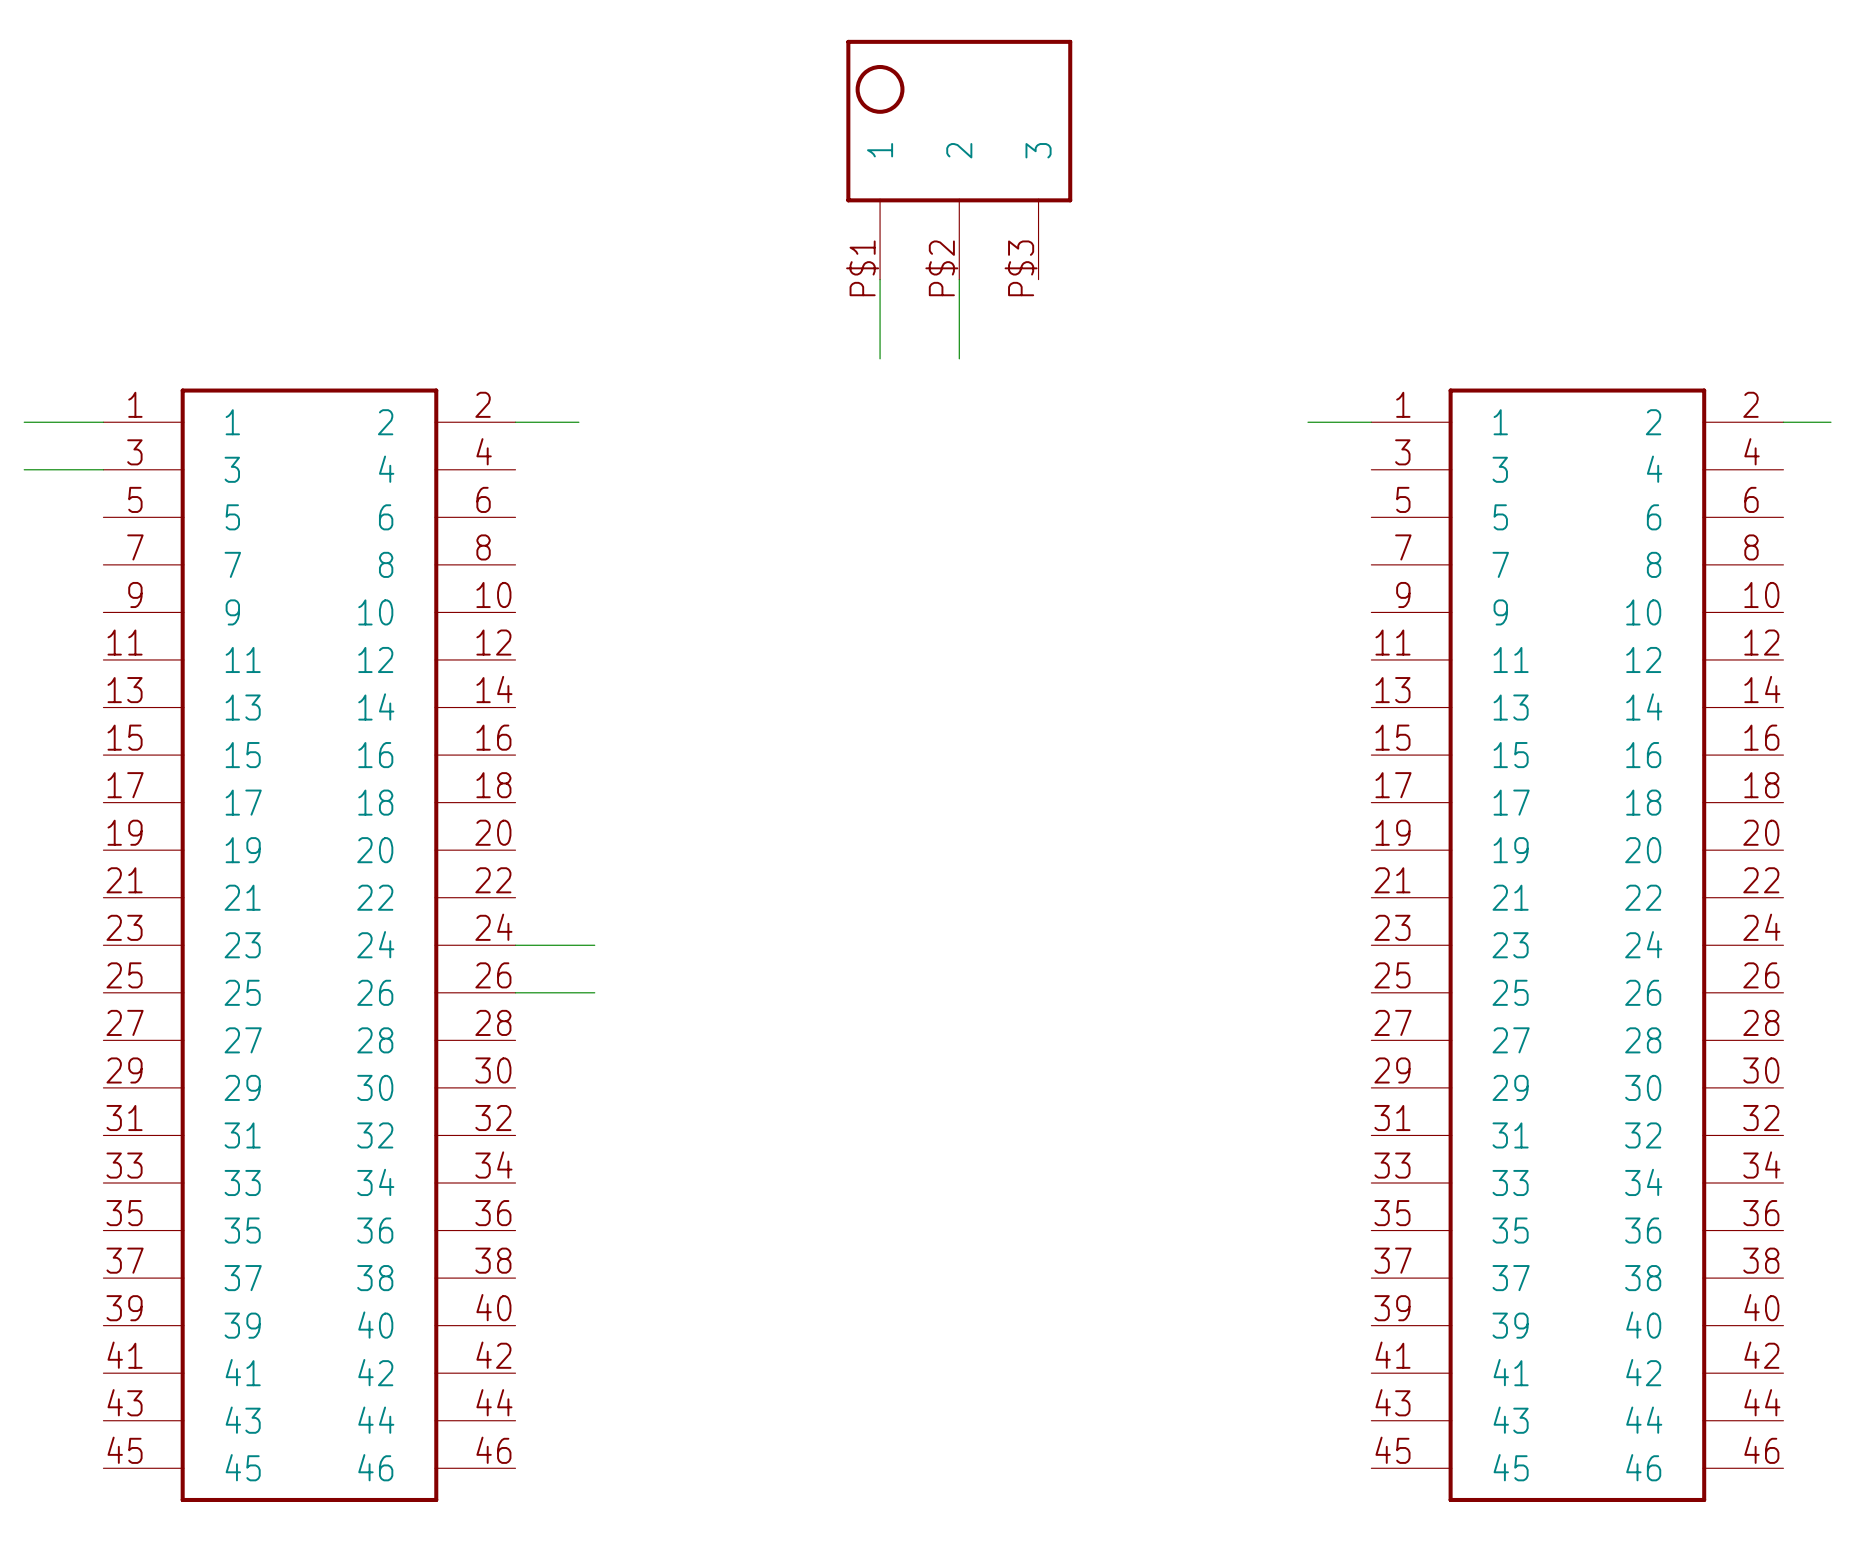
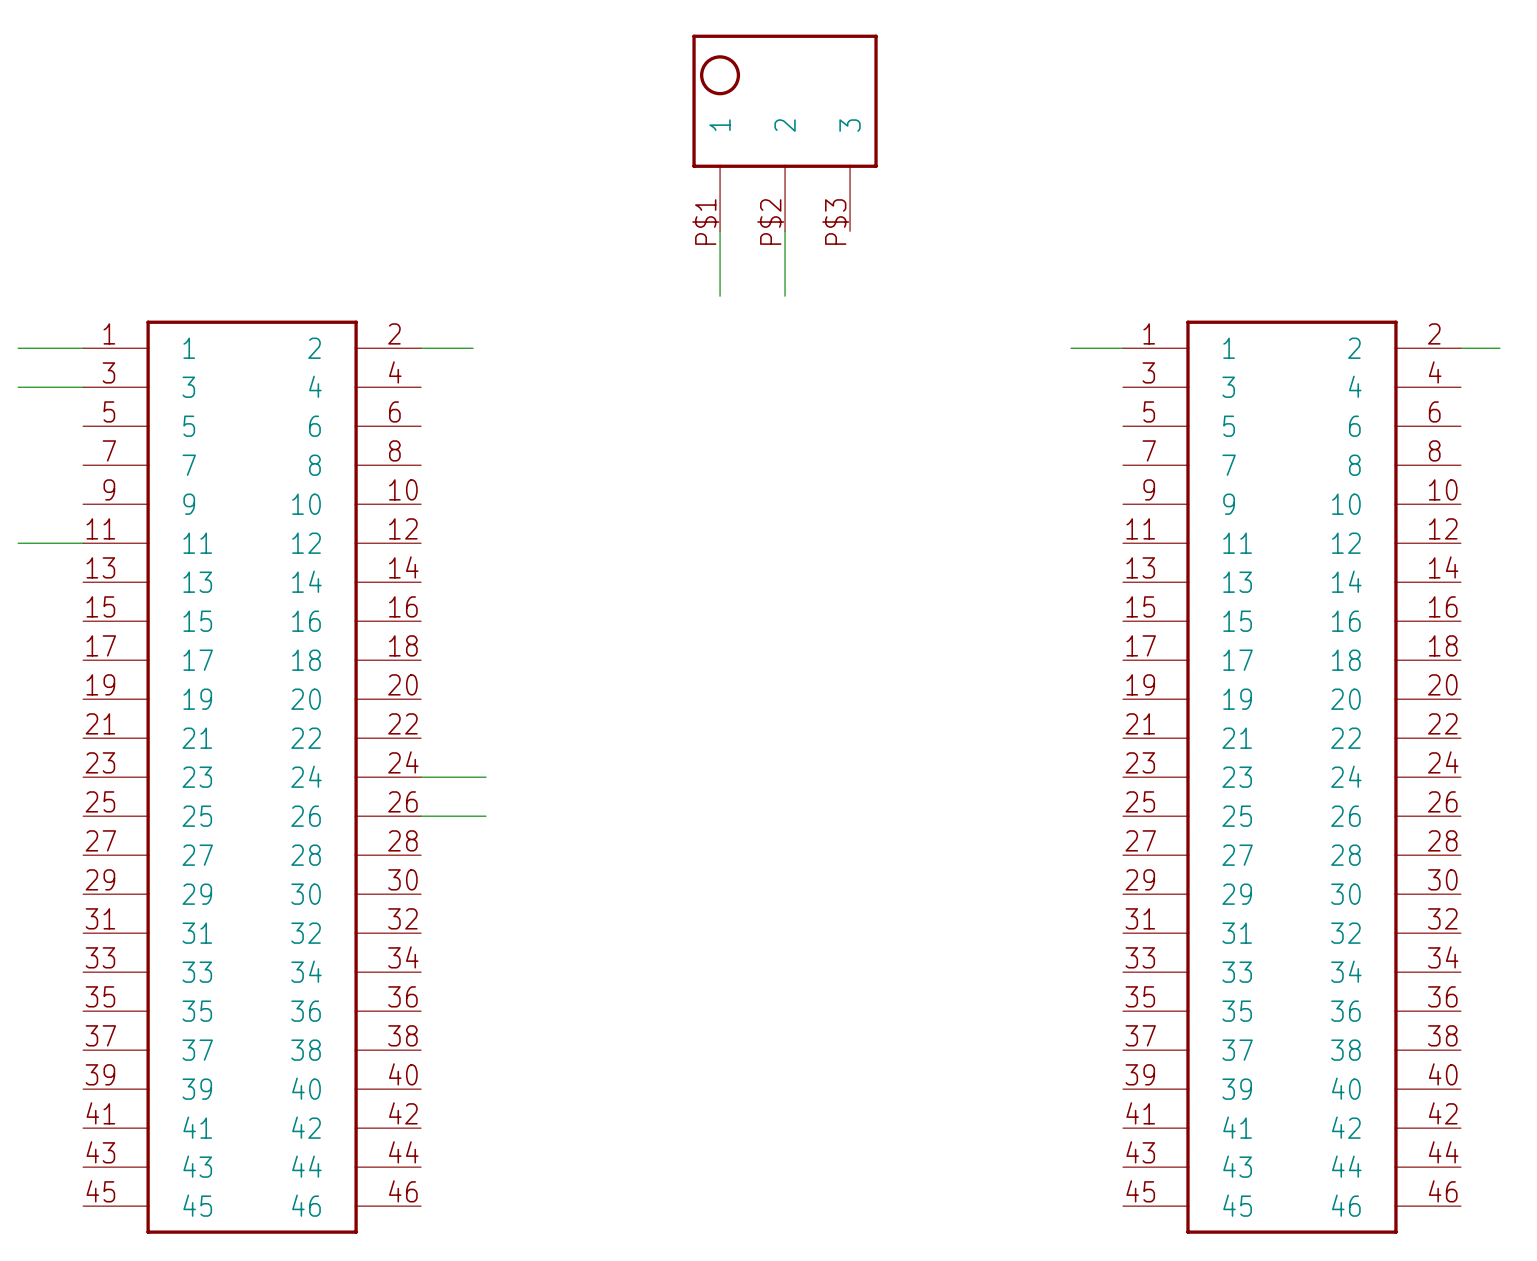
wire: none -> (18, 543) (83, 543)

